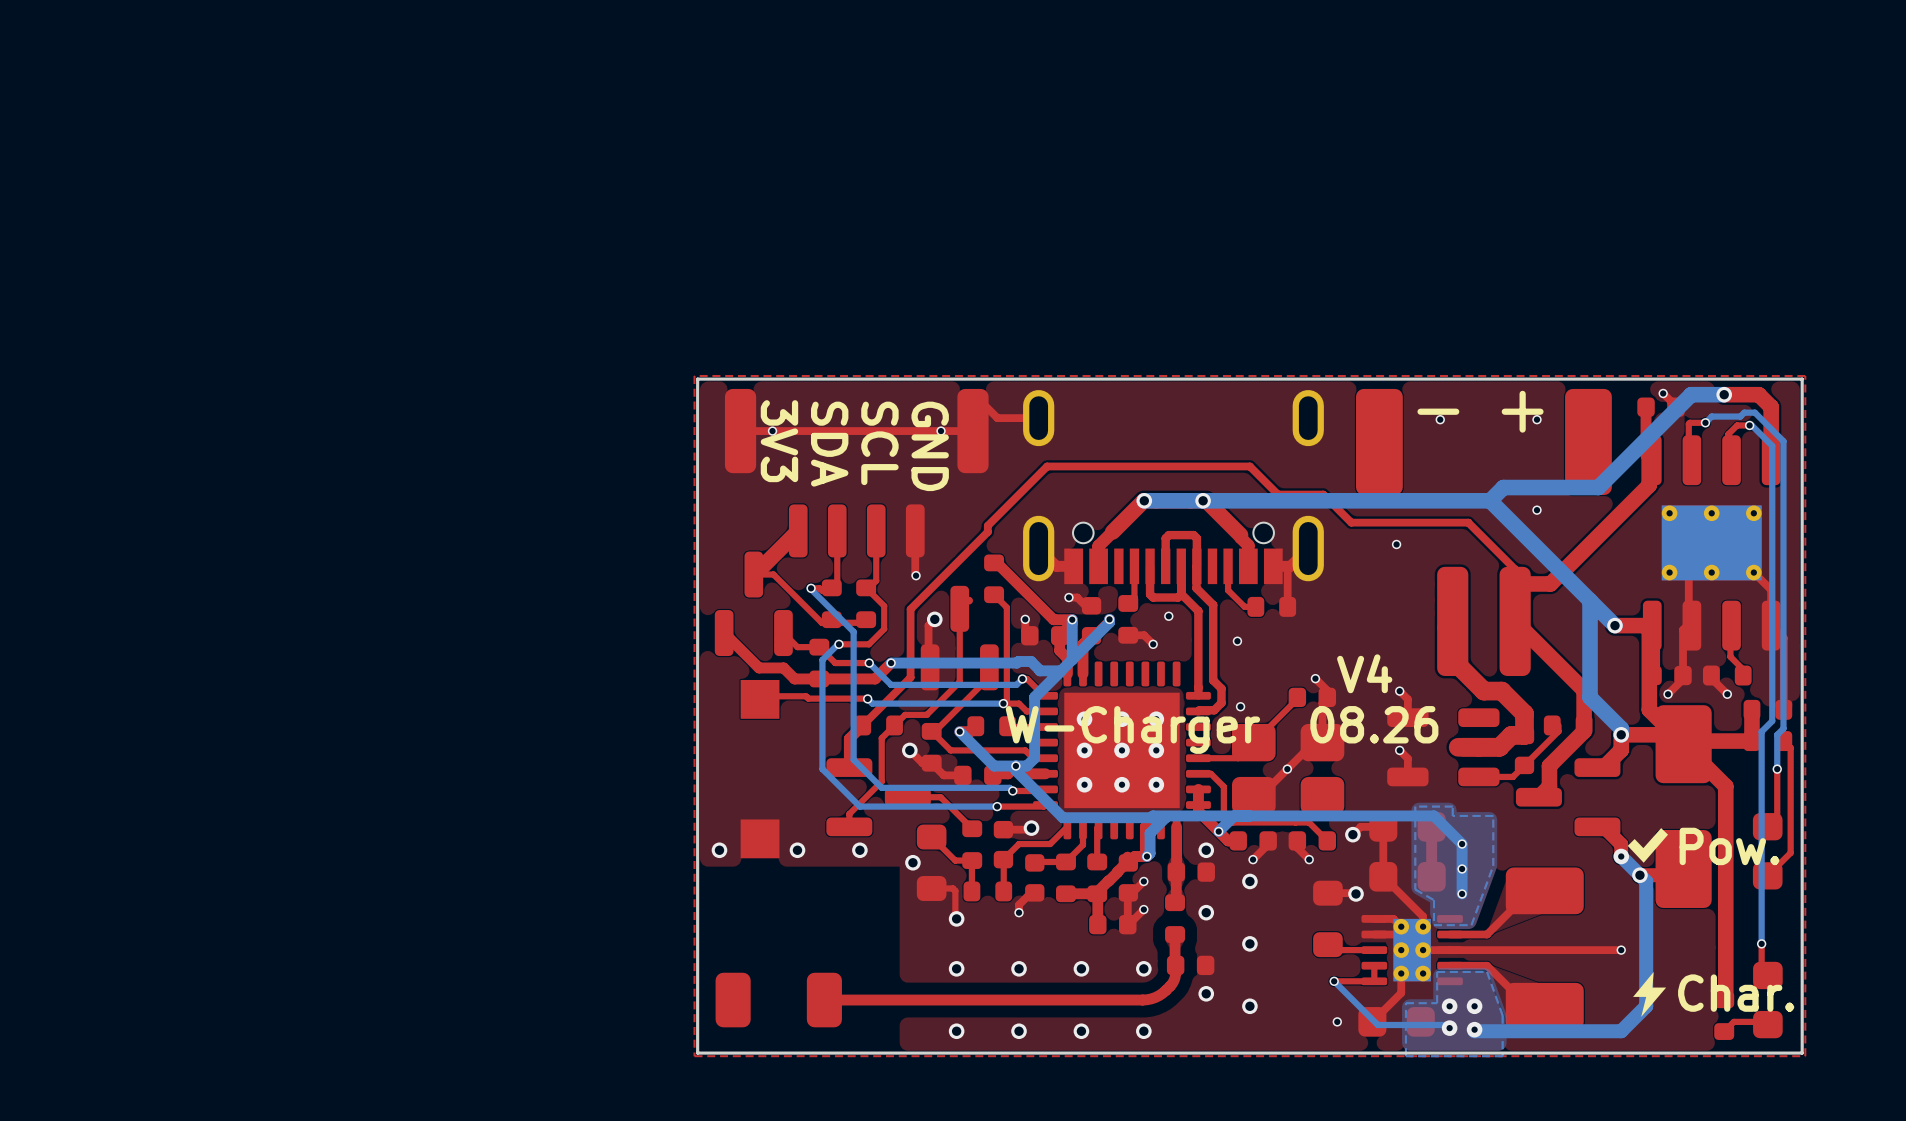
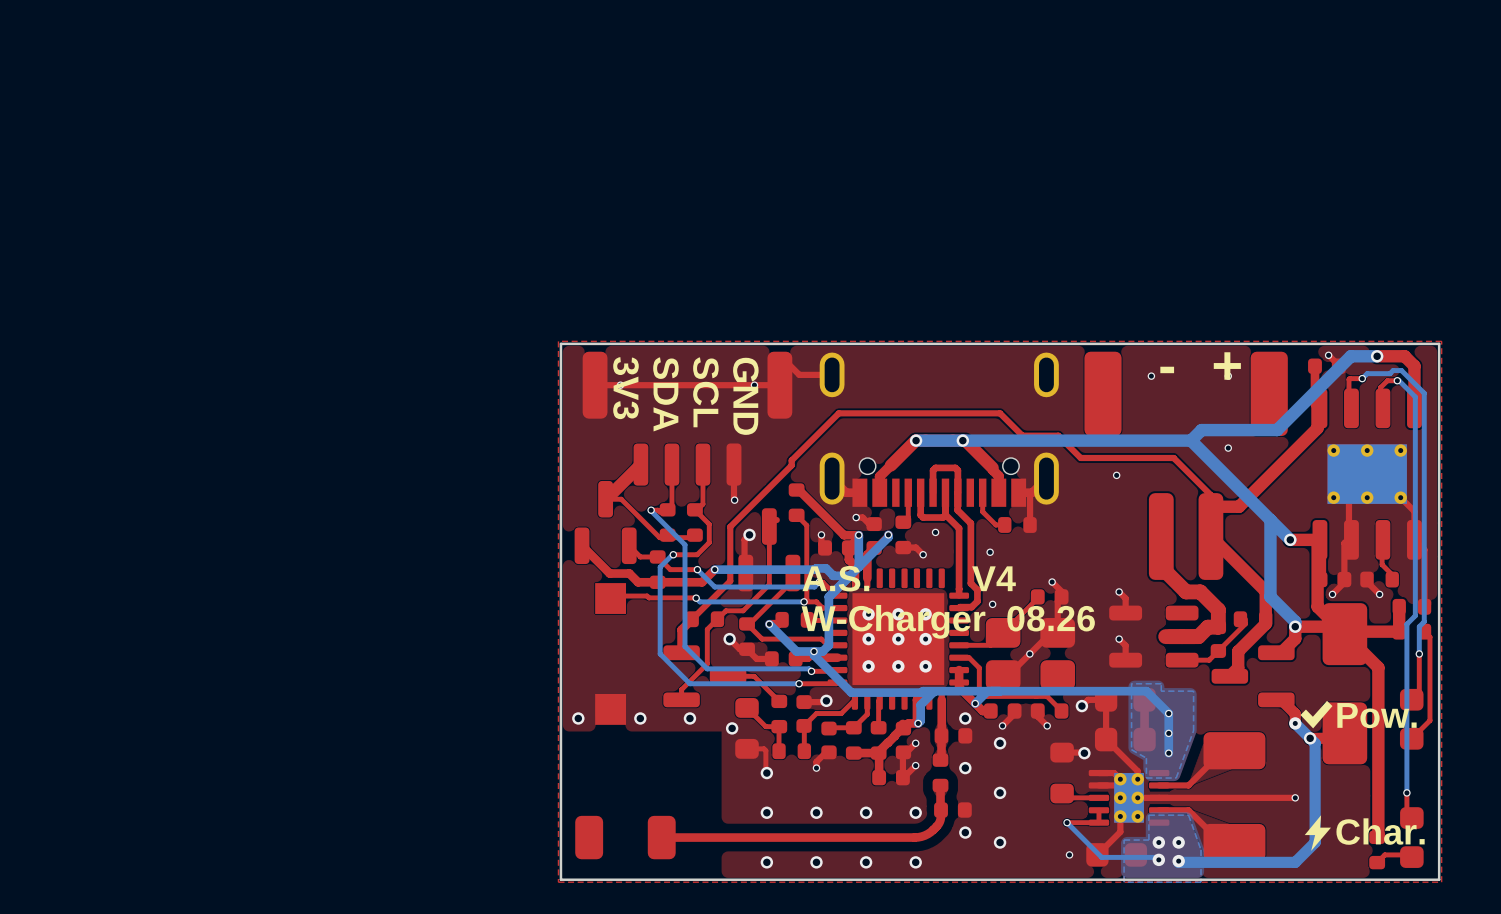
text: V4 (1364, 673) -> A.S. V4 (909, 578)

